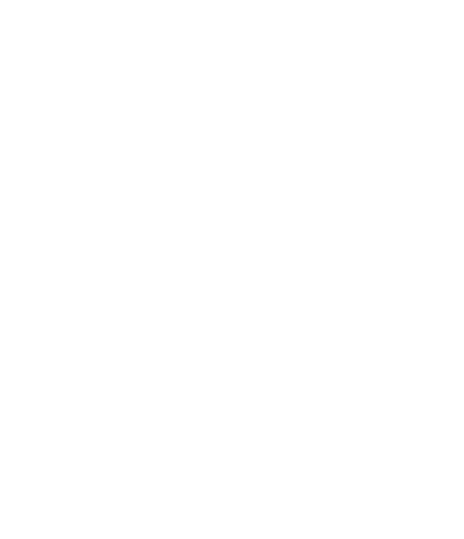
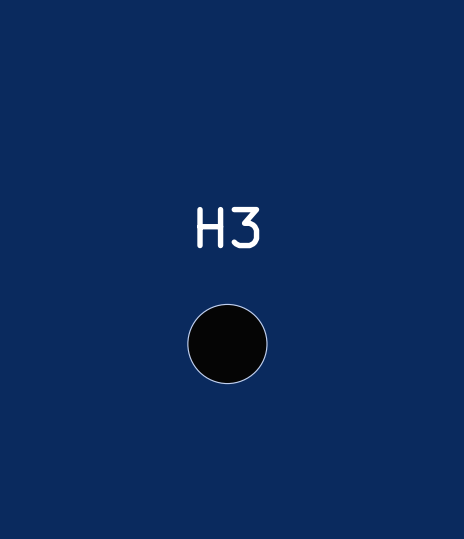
H3: none -> (227, 344)

